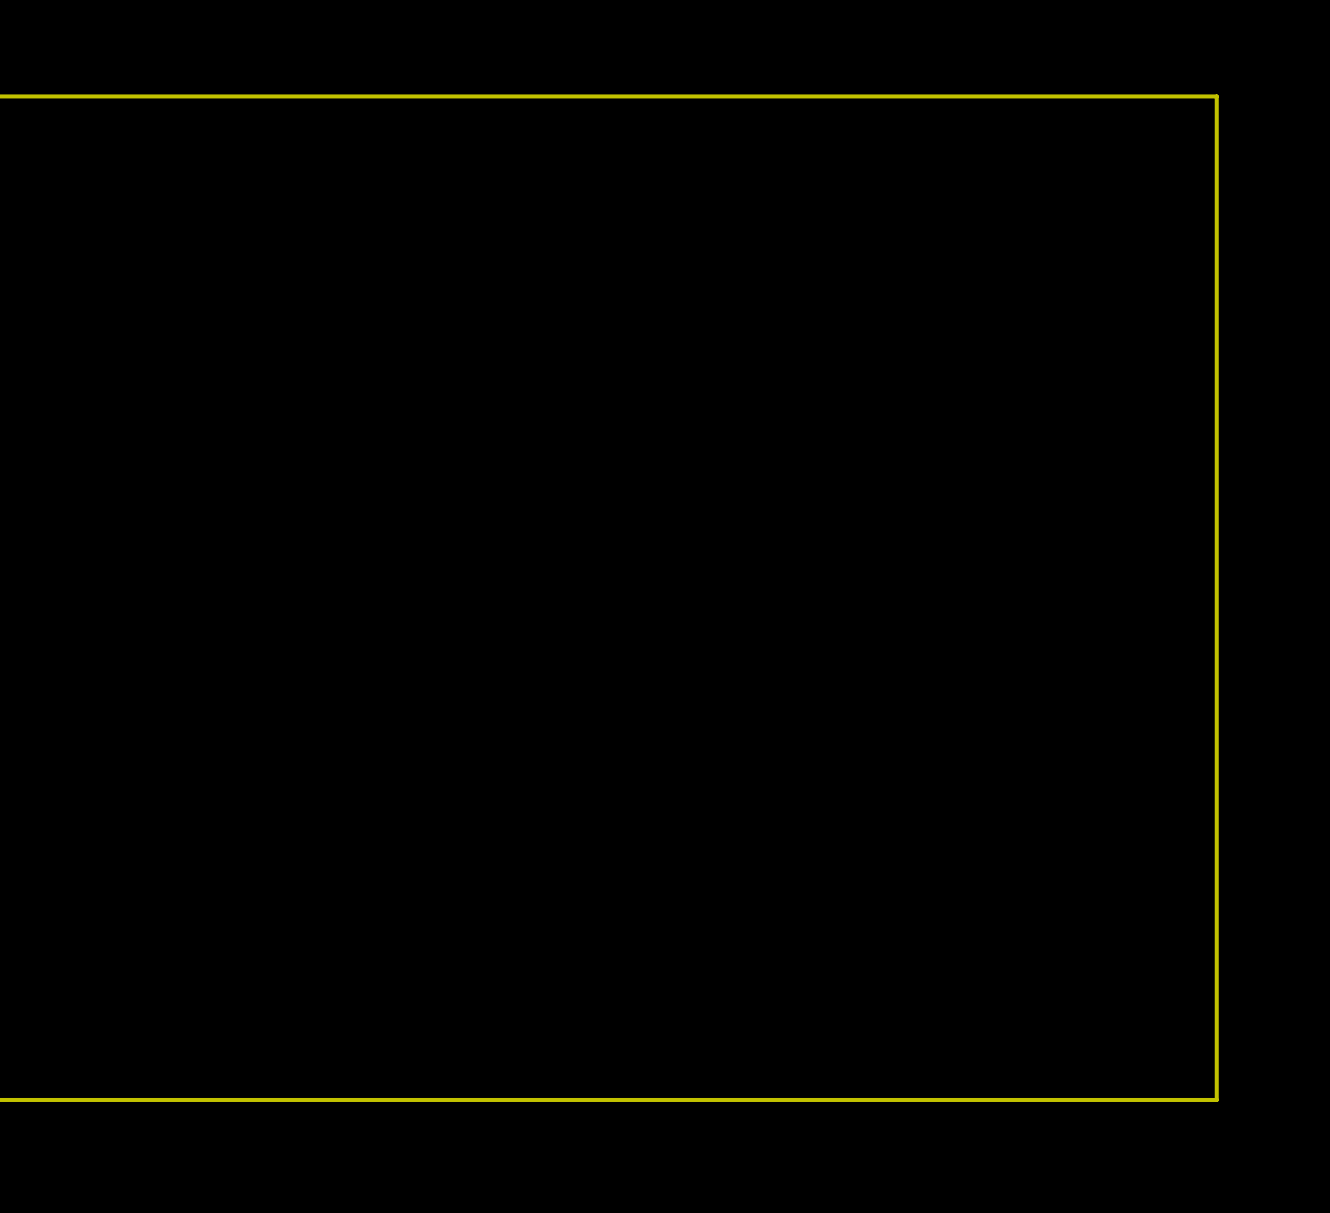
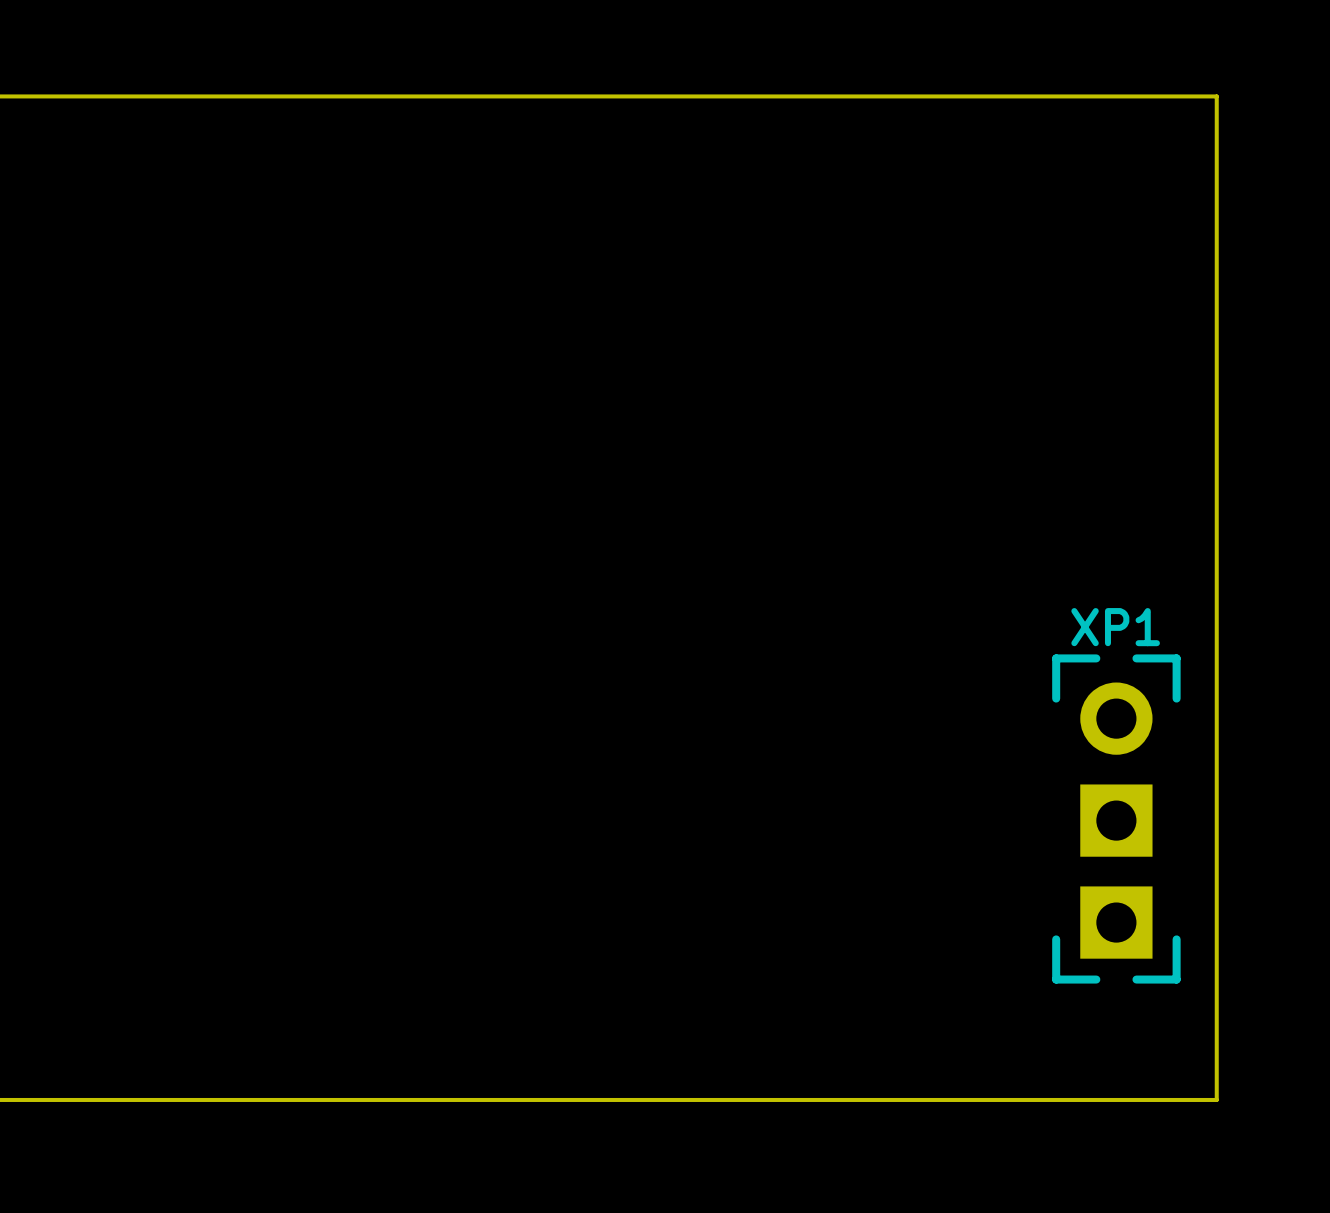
XP1: none -> (1116, 818)

